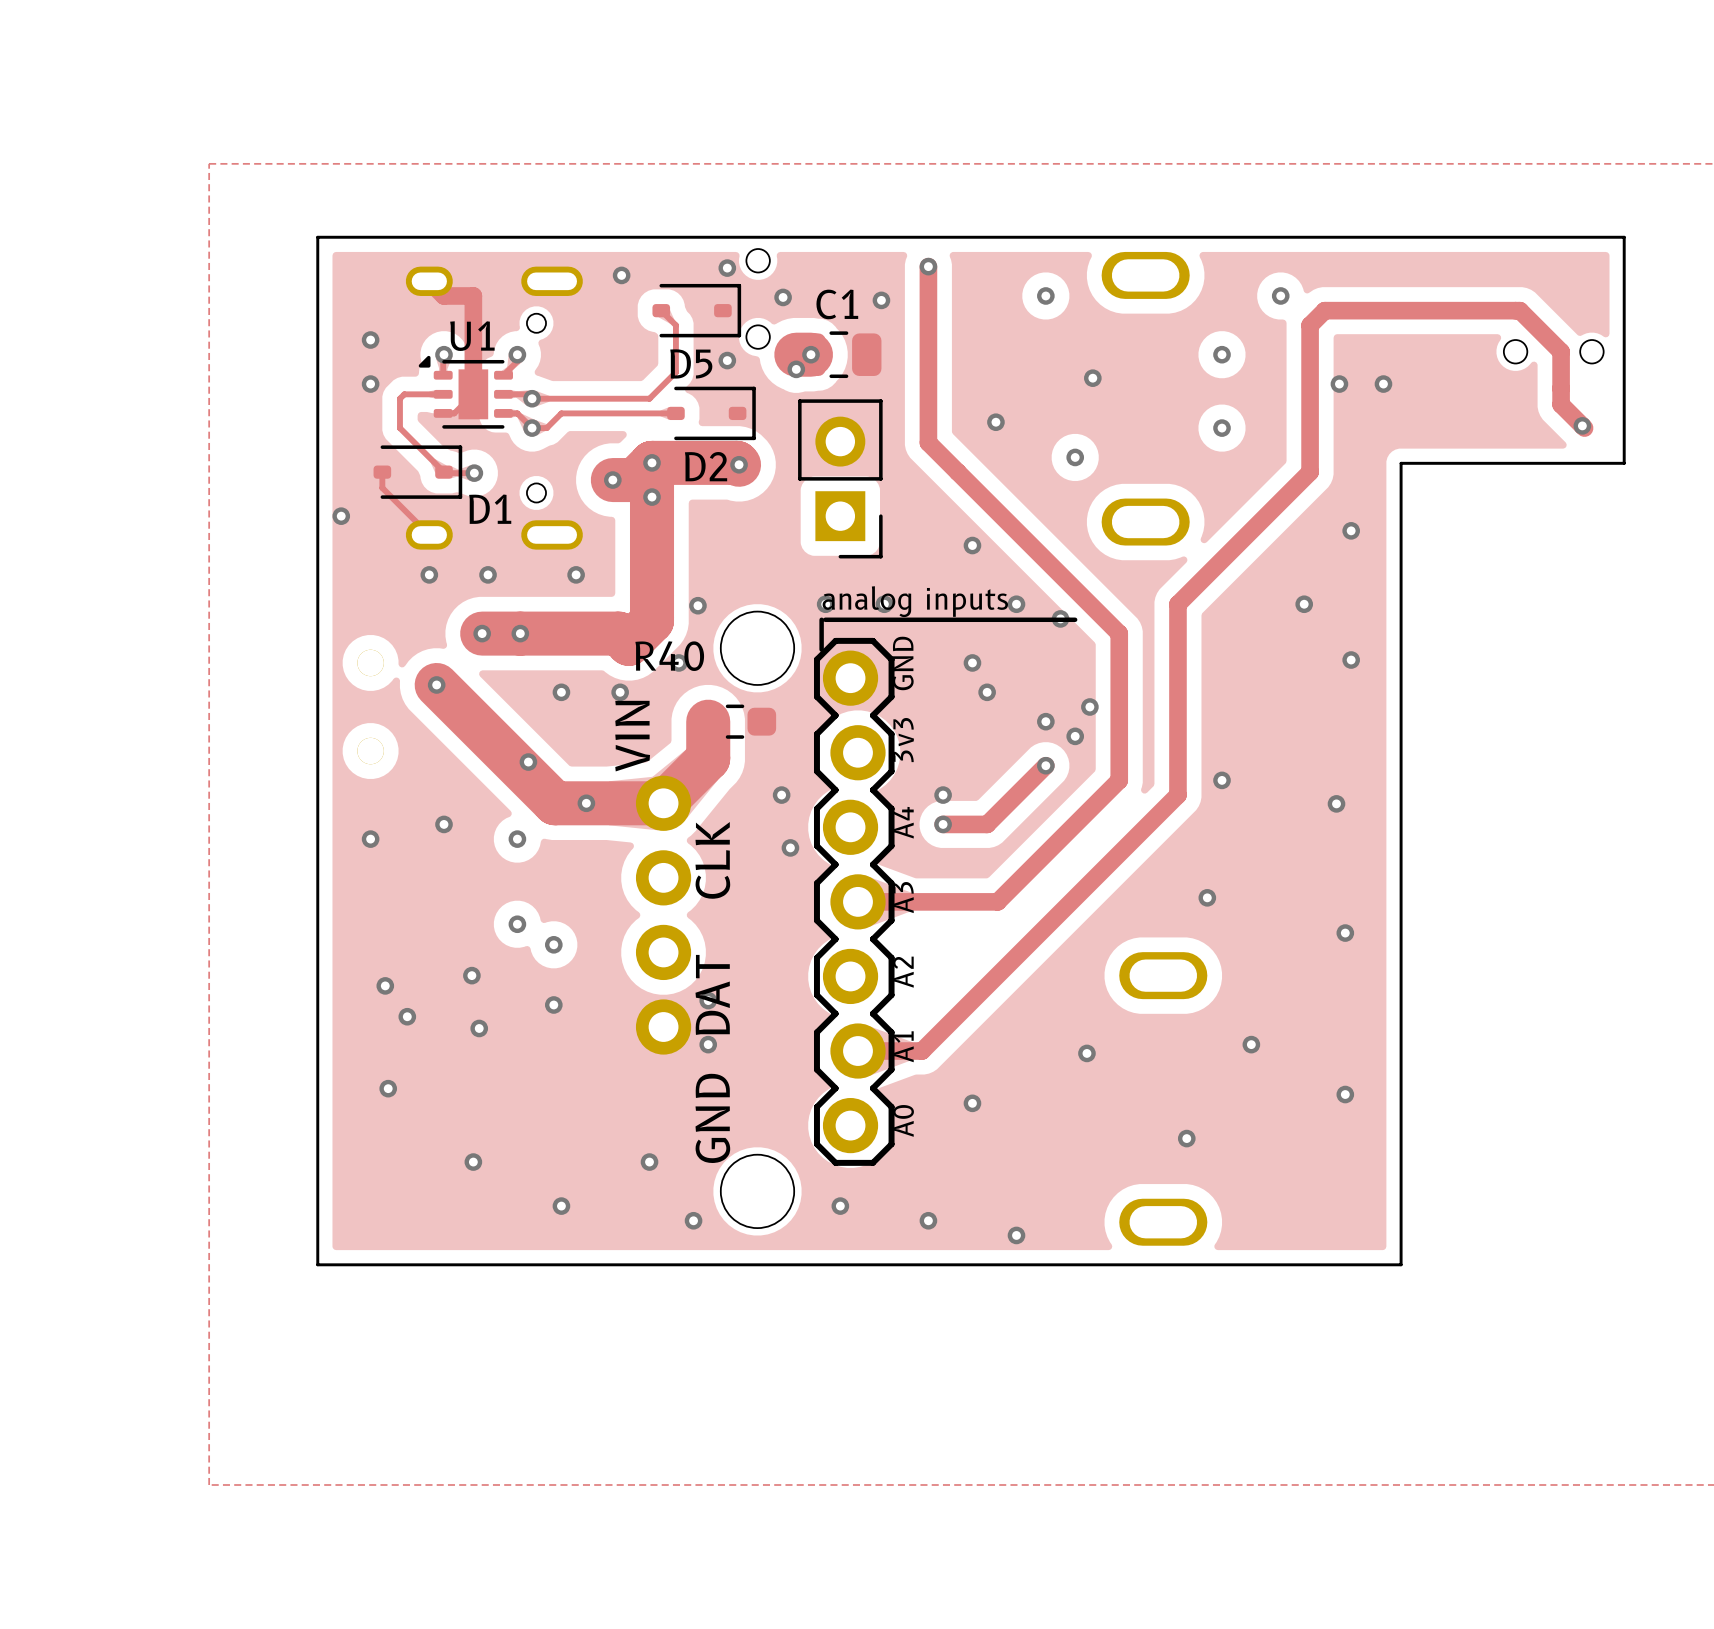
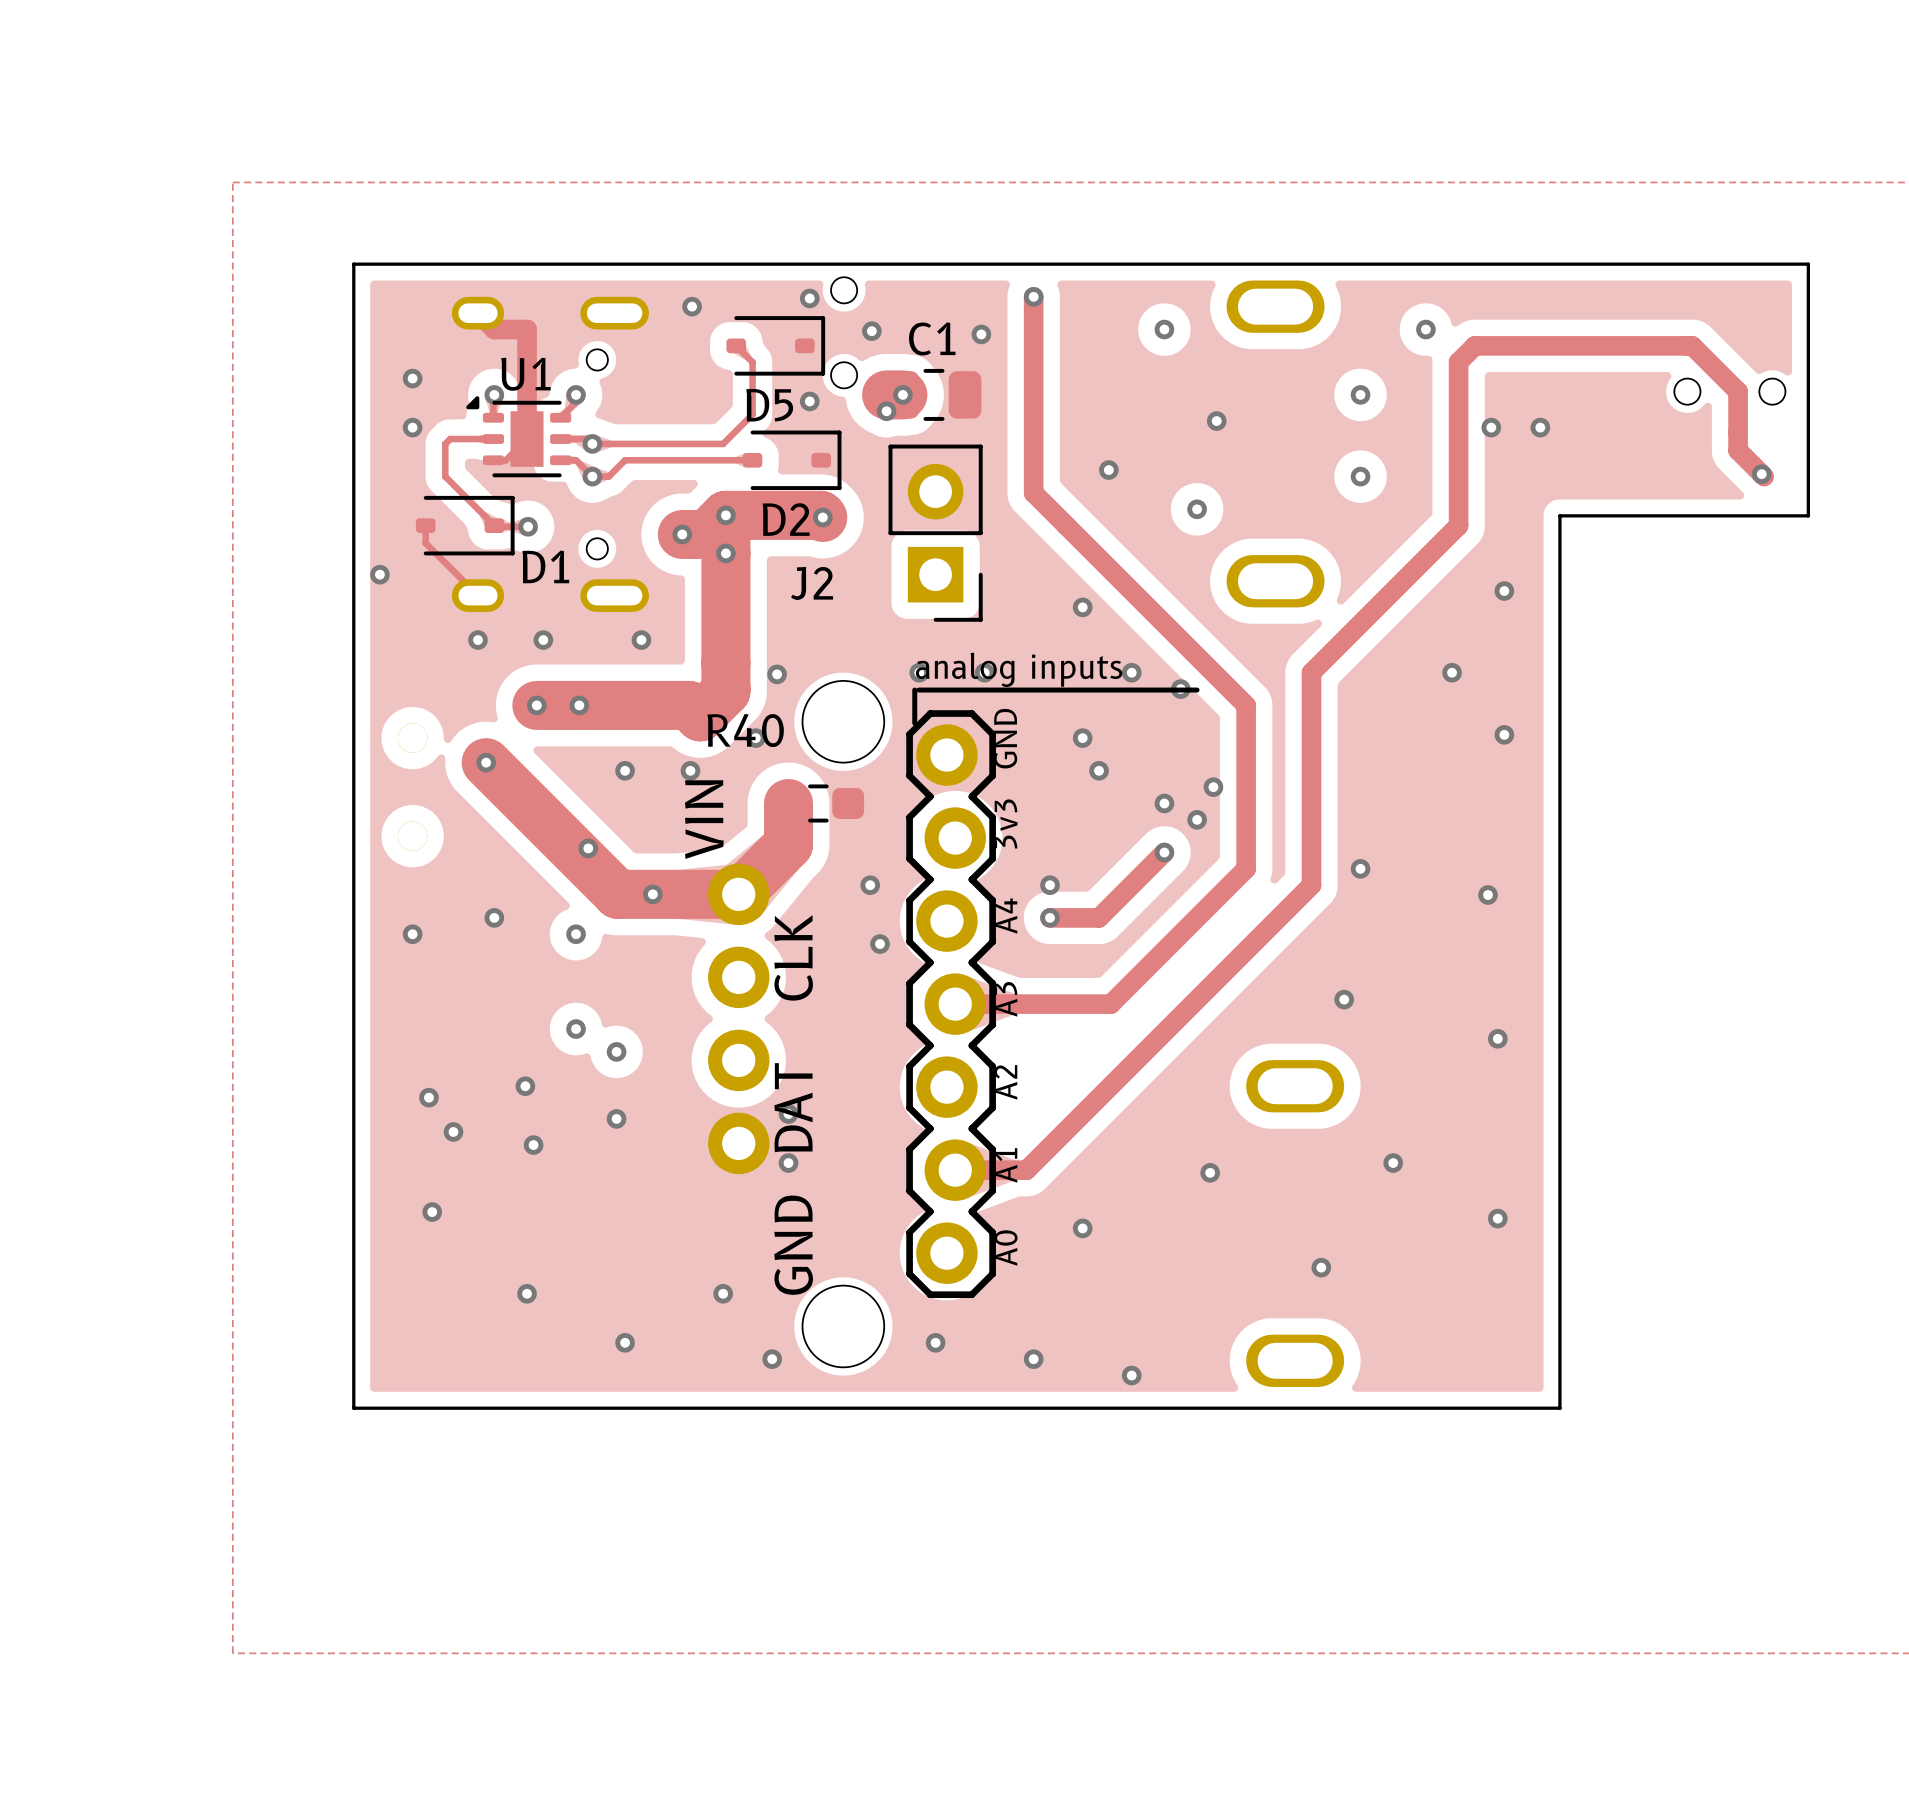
J2 name: none -> J2 (812, 583)

